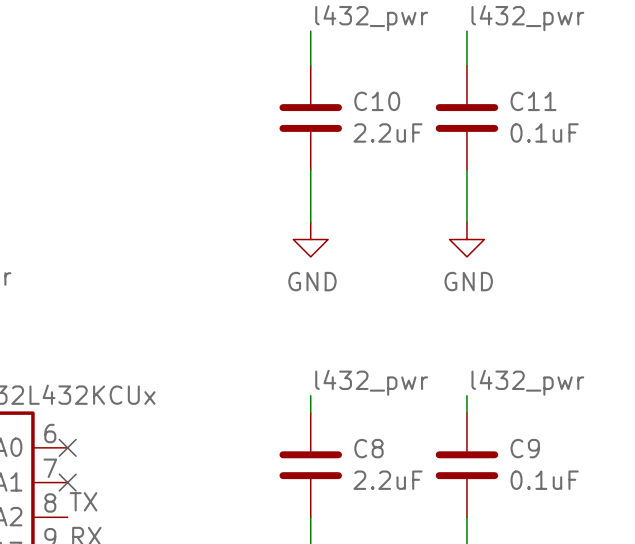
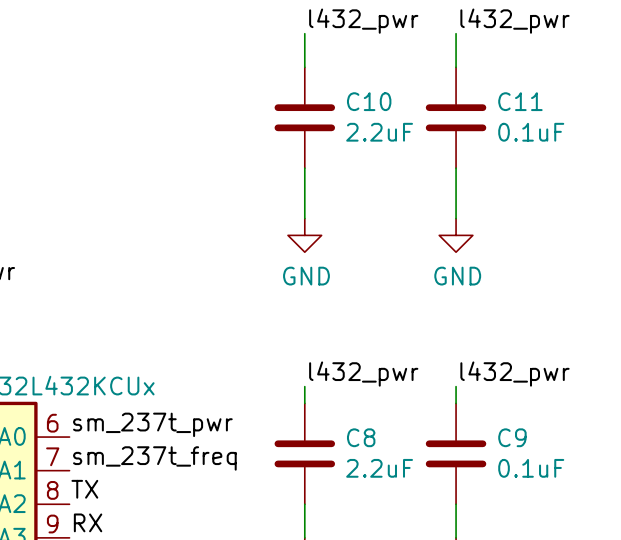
label: none -> sm_237t_pwr (152, 424)
no-connect mark: (67, 447) -> none
label: none -> sm_237t_freq (154, 458)
no-connect mark: (67, 482) -> none

